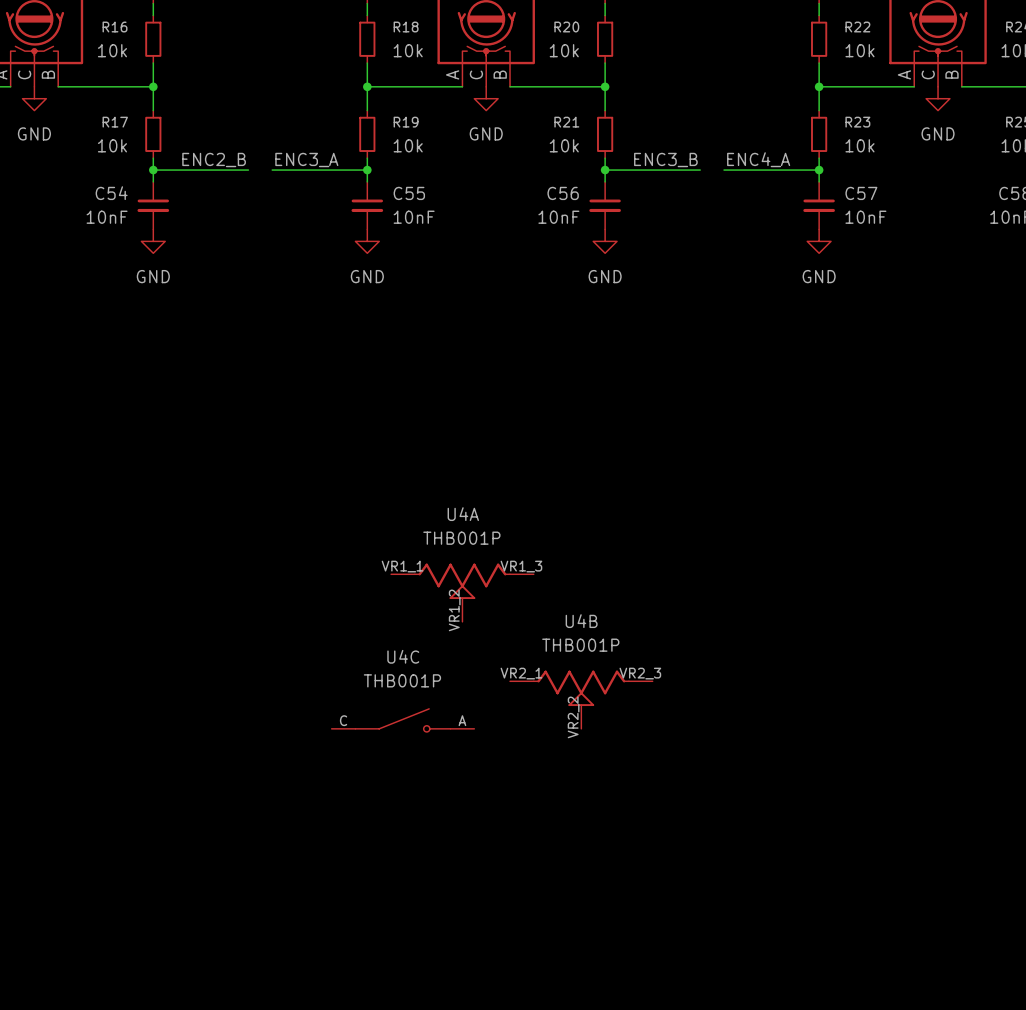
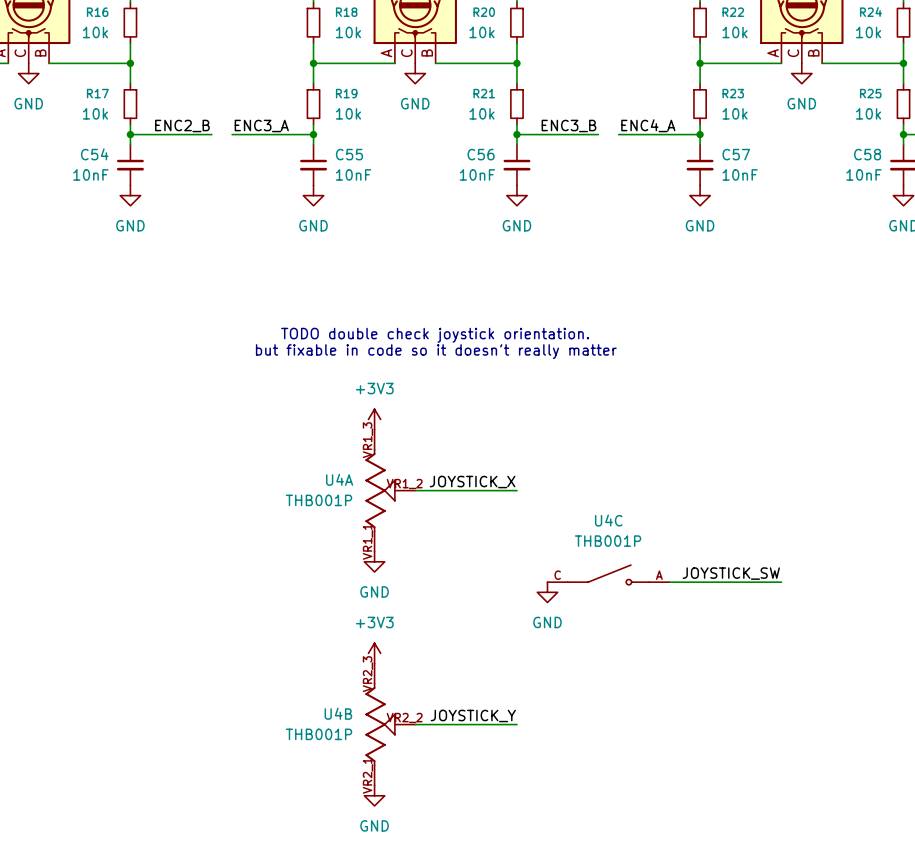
text: none -> TODO double check joystick orientation. (435, 335)
text: none -> but fixable in code so it doesn't really matter (436, 351)
power symbol: none -> +3V3 (374, 419)
U4A name position: U4A (463, 514) -> U4A (339, 479)
U4A value position: THB001P (461, 538) -> THB001P (319, 500)
label: none -> JOYSTICK_X (472, 482)
U4A rotation: 0° (462, 581) -> 90° counterclockwise (380, 490)
wire: none -> (415, 490) (516, 490)
U4B name position: U4B (581, 621) -> U4B (338, 713)
U4B value position: THB001P (580, 645) -> THB001P (319, 734)
power symbol: none -> GND (374, 561)
label: none -> JOYSTICK_SW (731, 573)
U4B rotation: 0° (581, 688) -> 90° counterclockwise (380, 724)
wire: none -> (669, 582) (781, 582)
U4B position: (581, 699) -> (390, 724)
power symbol: none -> GND (547, 592)
U4C position: (402, 720) -> (608, 574)
power symbol: none -> +3V3 (374, 653)
label: none -> JOYSTICK_Y (473, 715)
wire: none -> (415, 724) (516, 724)
power symbol: none -> GND (374, 795)

